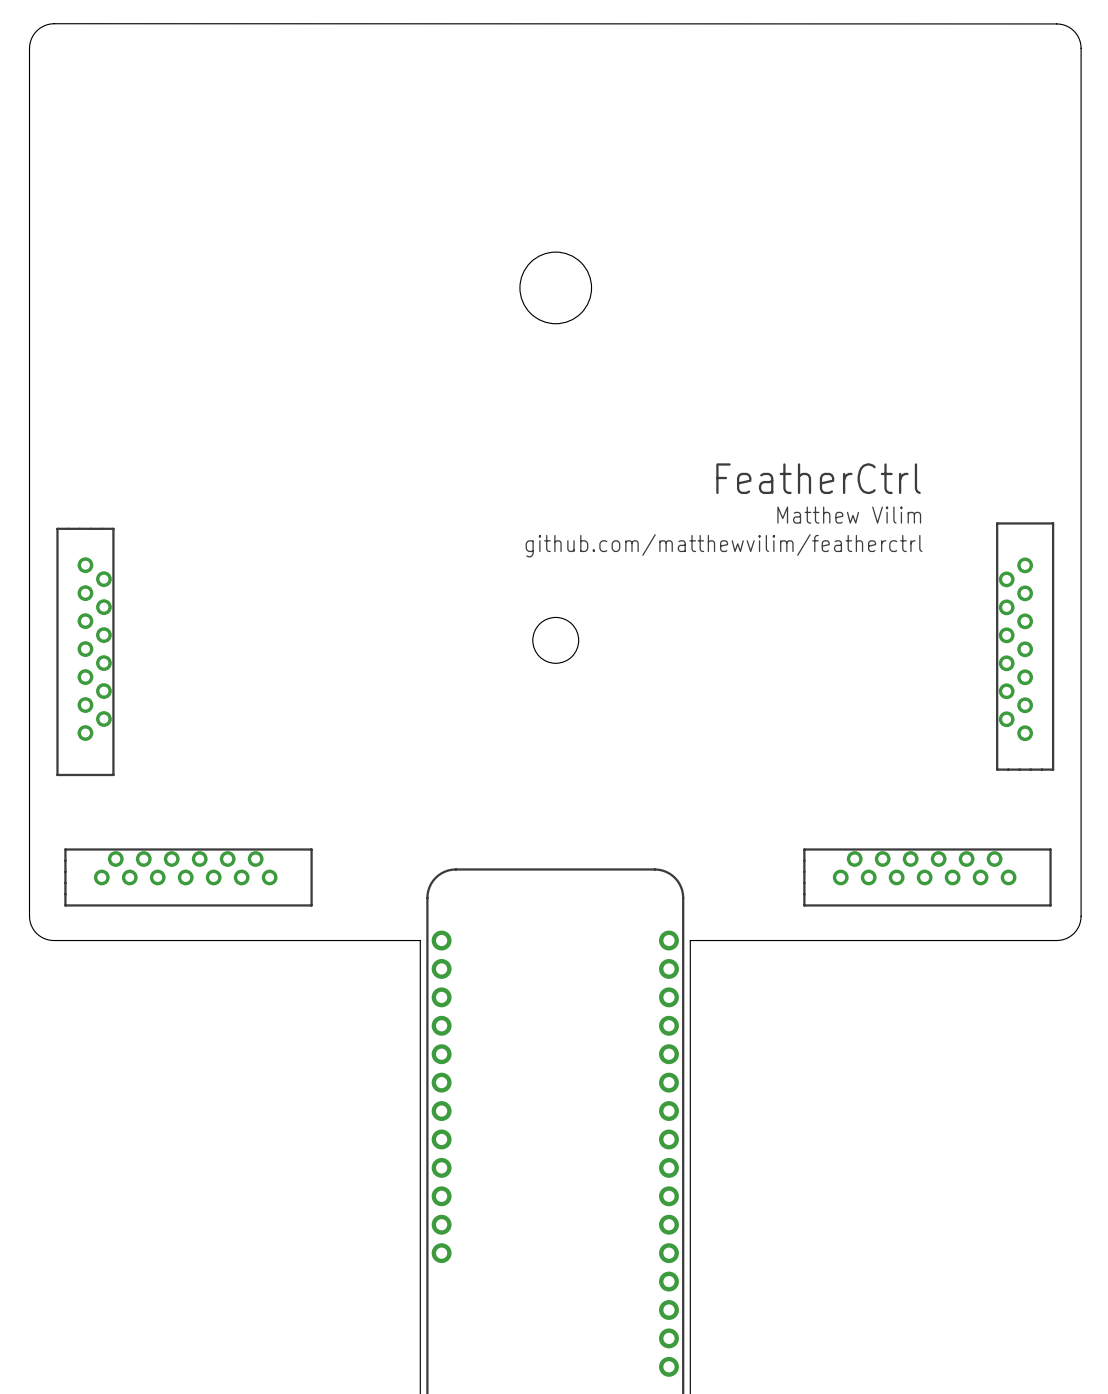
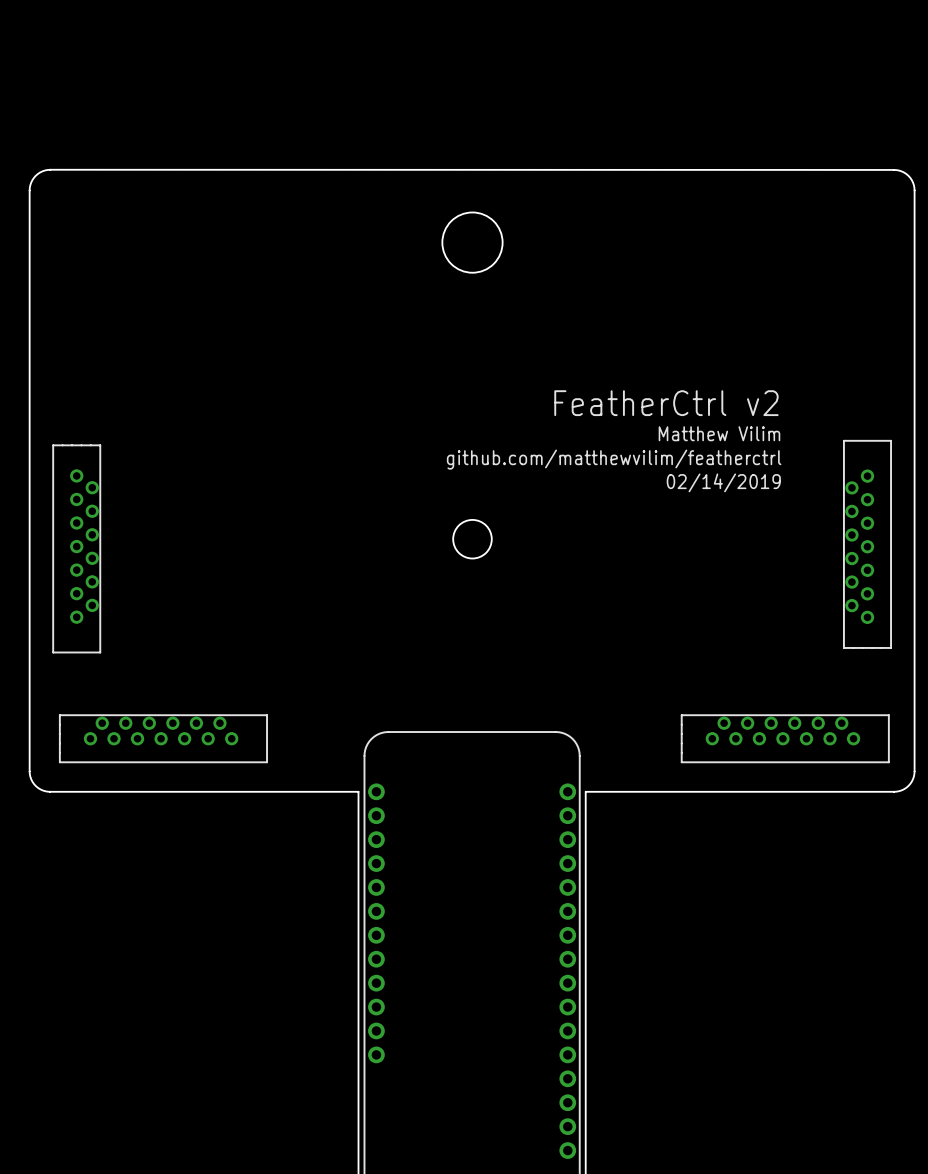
board edge: (1081, 225) (1080, 45) (1073, 31) (1059, 24) (54, 23) (44, 25) (36, 30) (29, 45) (29, 226) -> (914, 190) (913, 182) (908, 175) (901, 171) (894, 169) (50, 169) (42, 171) (35, 175) (31, 182) (29, 190)
text: FeatherCtrl (818, 478) -> FeatherCtrl v2 (666, 403)
text: none -> 02/14/2019 (723, 482)

